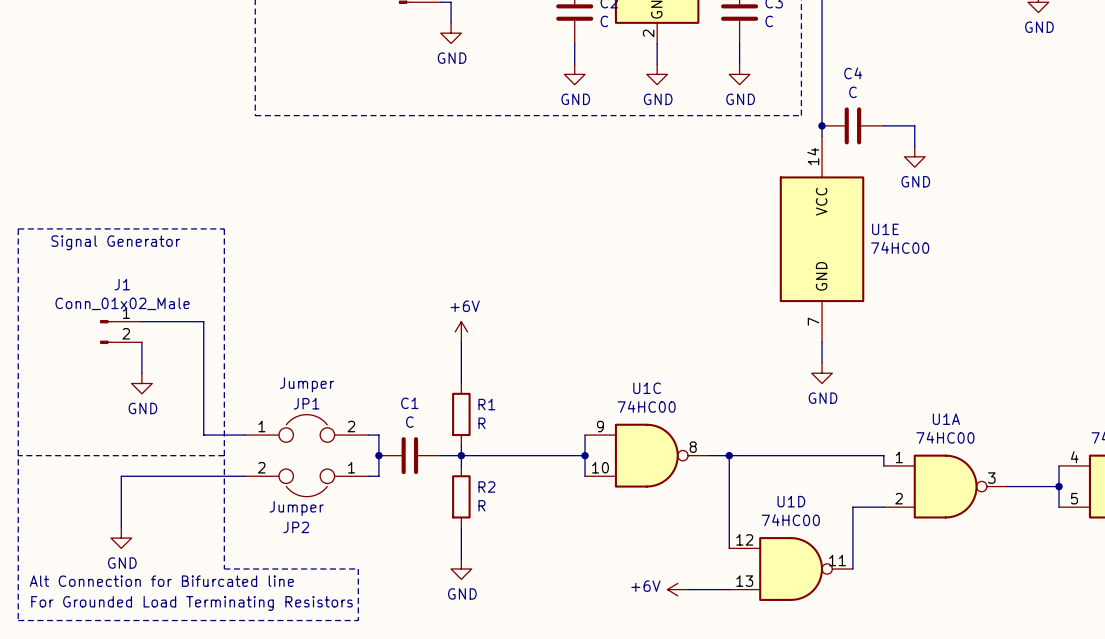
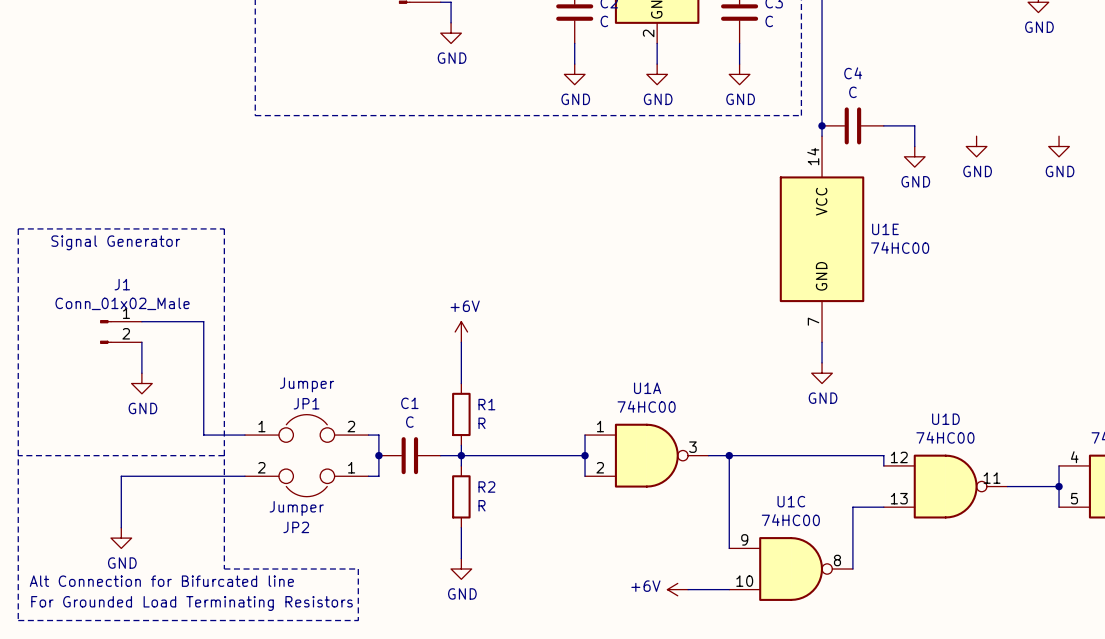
power symbol: none -> GND (976, 146)
power symbol: none -> GND (1059, 146)
U1C position: (646, 455) -> (791, 569)
U1A position: (945, 486) -> (646, 455)
U1D position: (791, 569) -> (945, 486)

